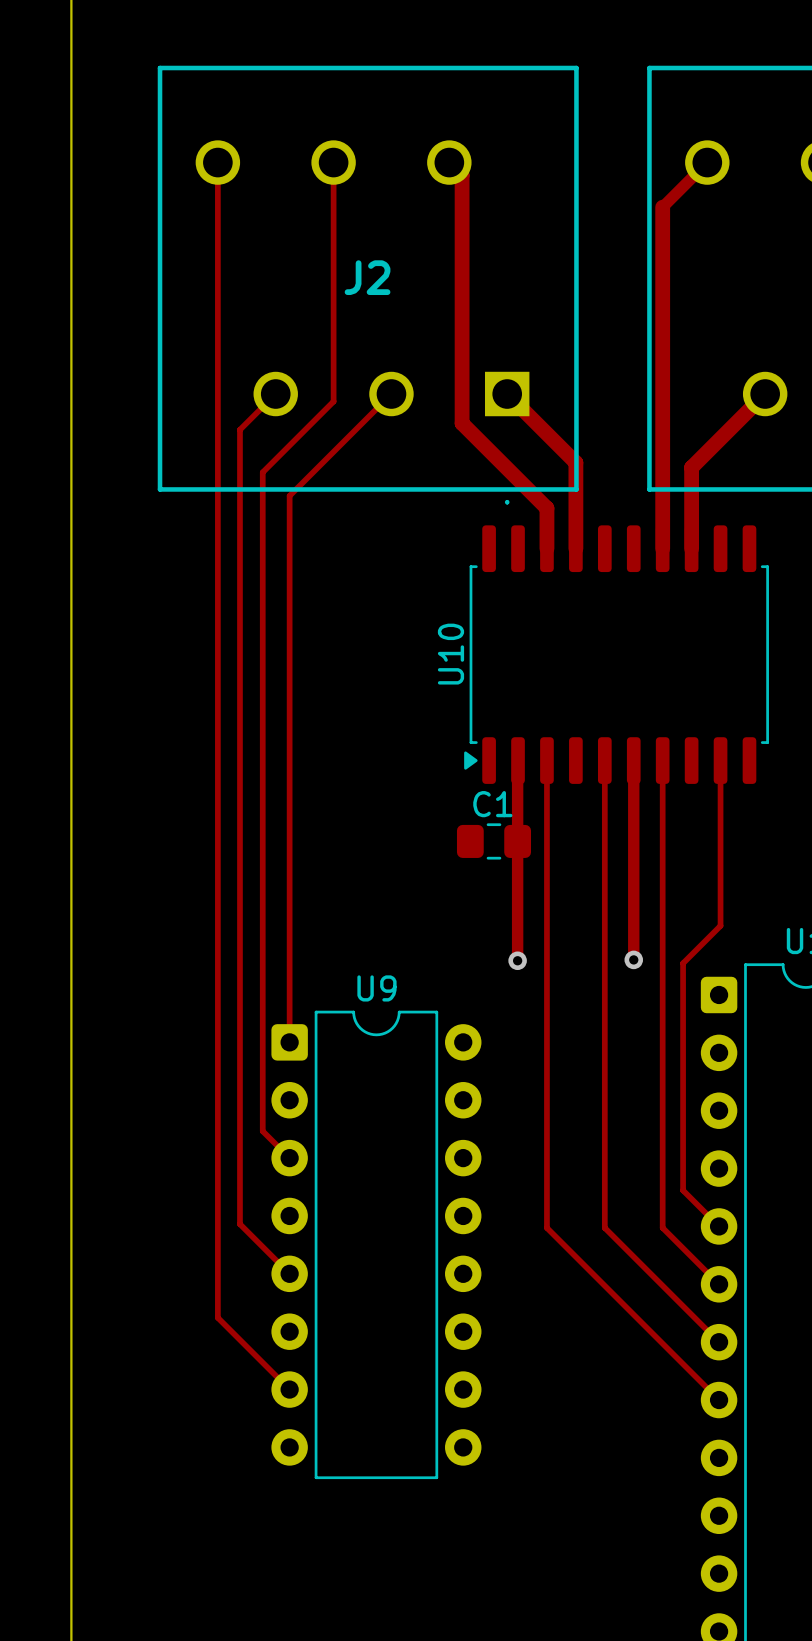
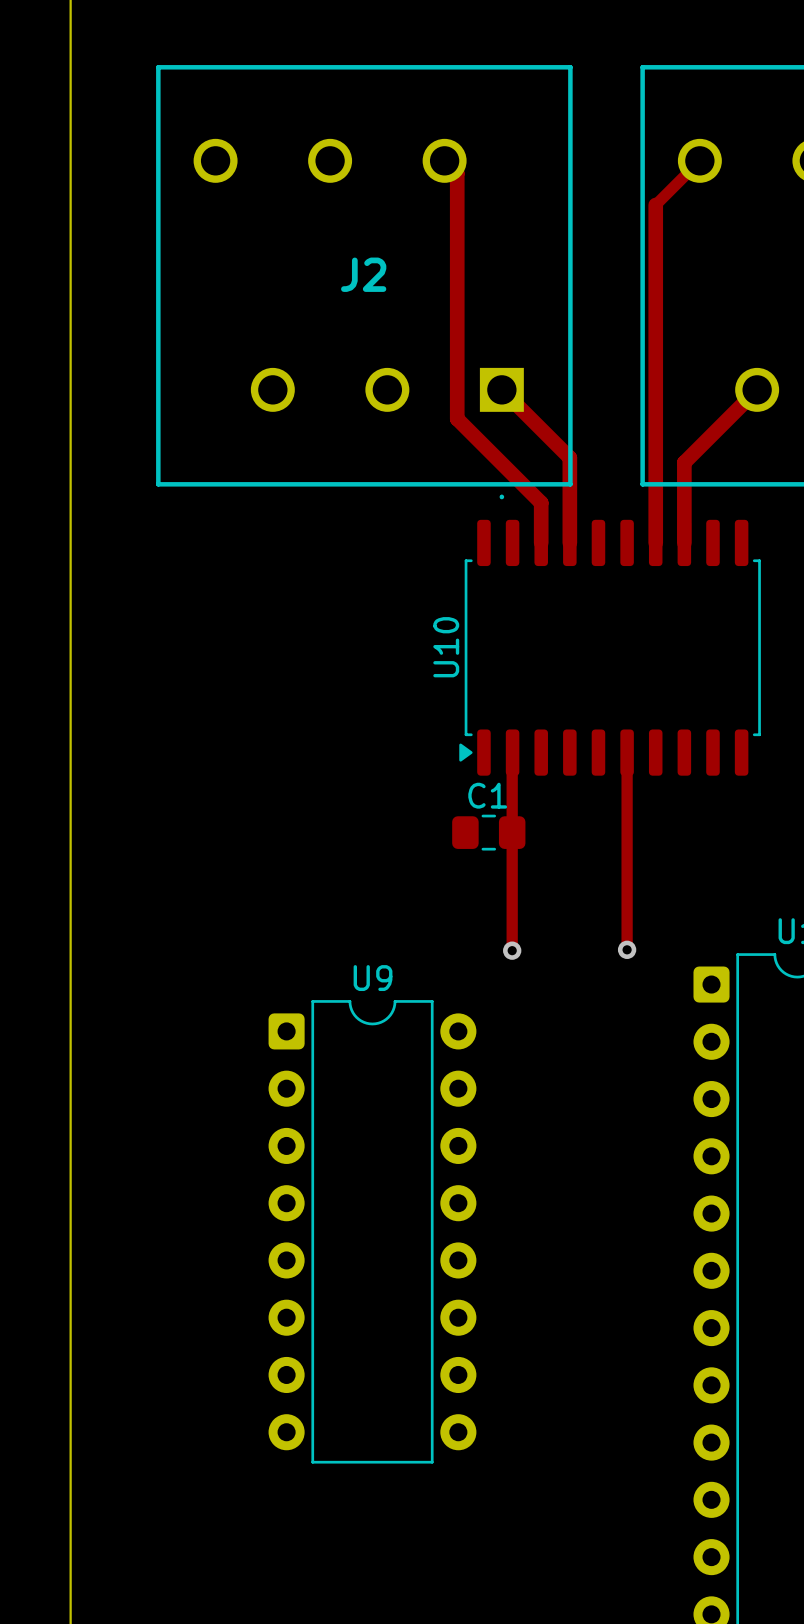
track: (217, 162) (217, 1317) (289, 1389) -> none
track: (333, 162) (333, 401) (262, 472) (262, 1131) (289, 1158) -> none
track: (275, 394) (239, 429) (239, 1224) (289, 1273) -> none
track: (391, 394) (289, 495) (289, 1042) -> none
track: (546, 760) (546, 1227) (719, 1400) -> none
track: (604, 760) (604, 1227) (719, 1342) -> none
track: (662, 760) (662, 1227) (719, 1284) -> none
track: (720, 760) (720, 925) (683, 963) (683, 1190) (719, 1226) -> none

